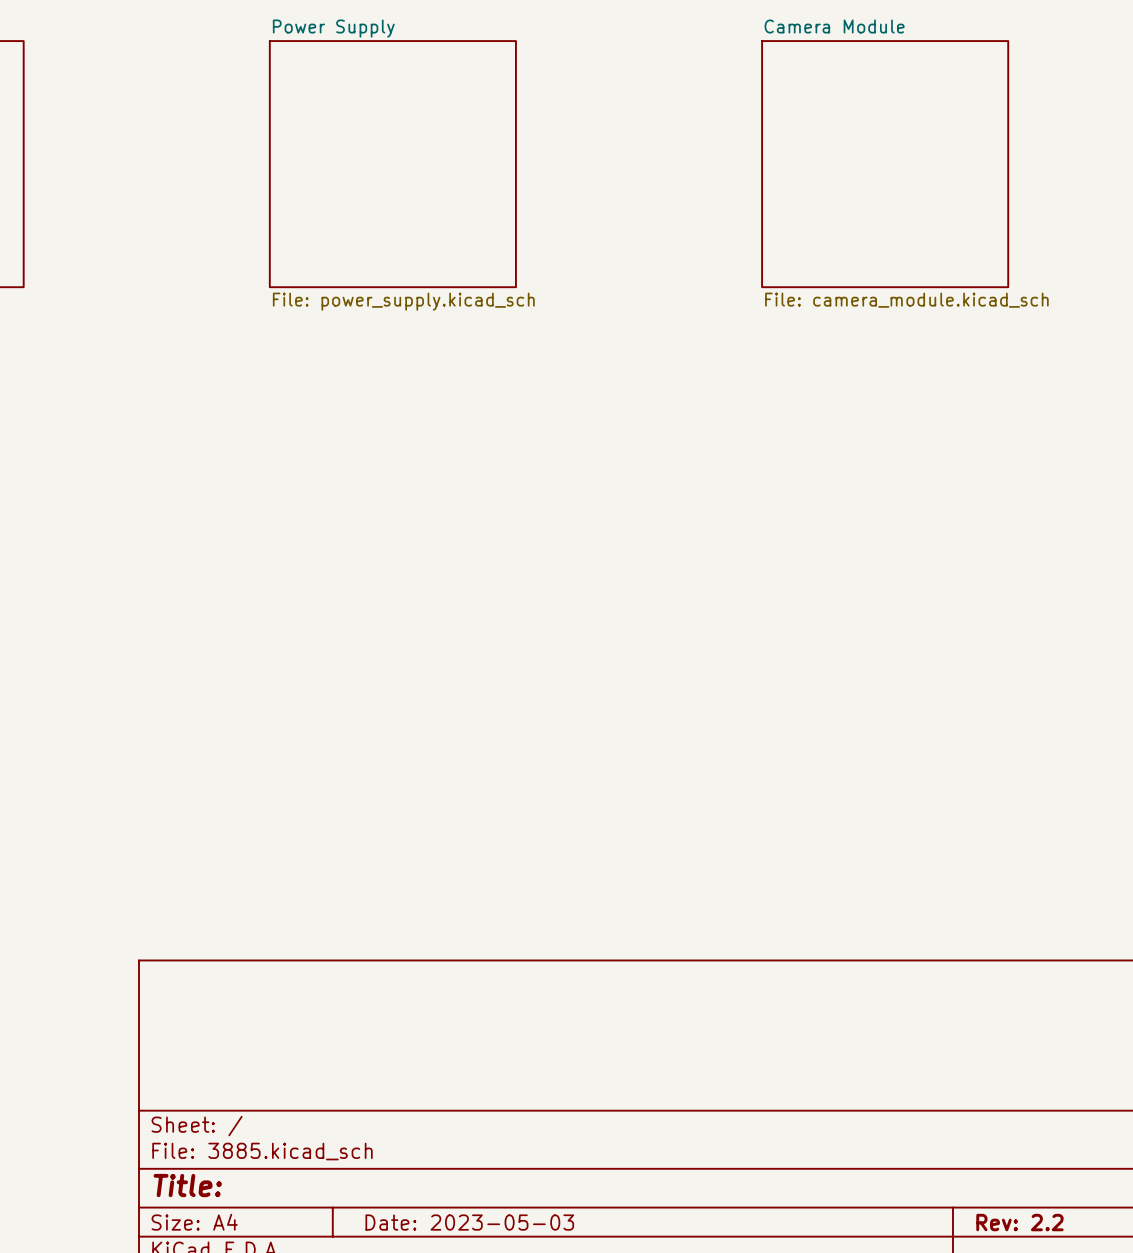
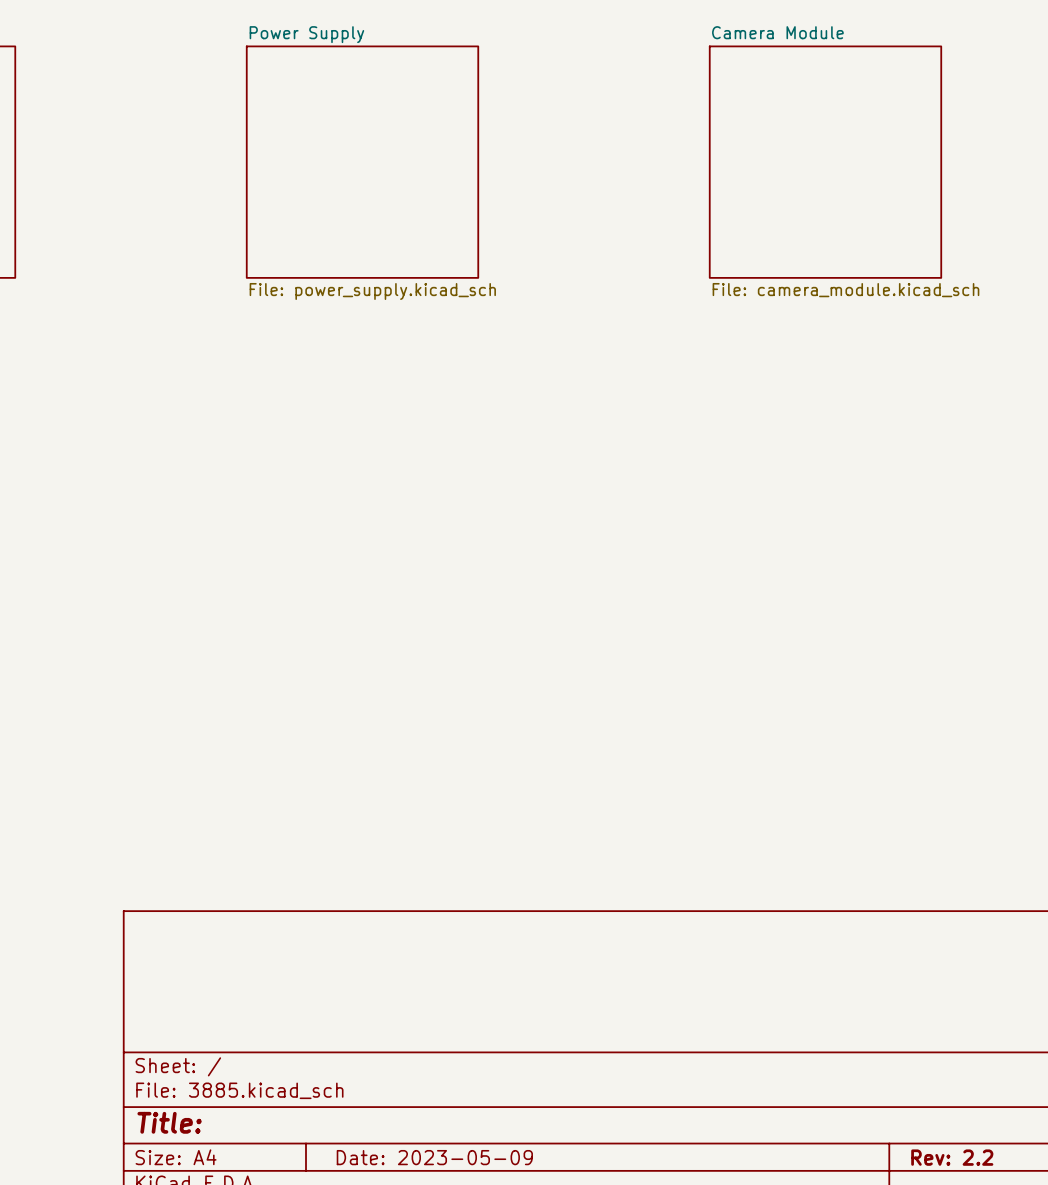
title block: Date: 2023-05-03 (469, 1222) -> Date: 2023-05-09 (434, 1157)

